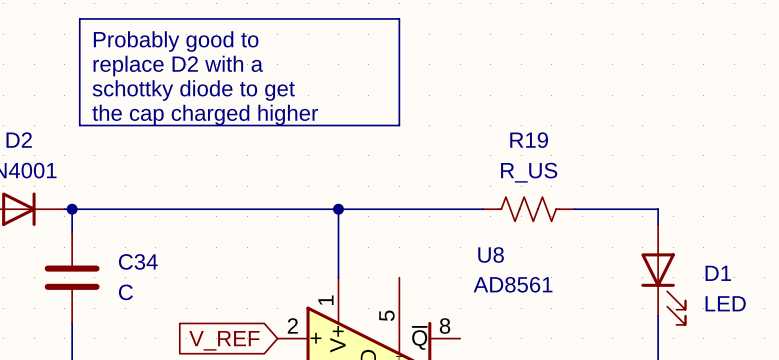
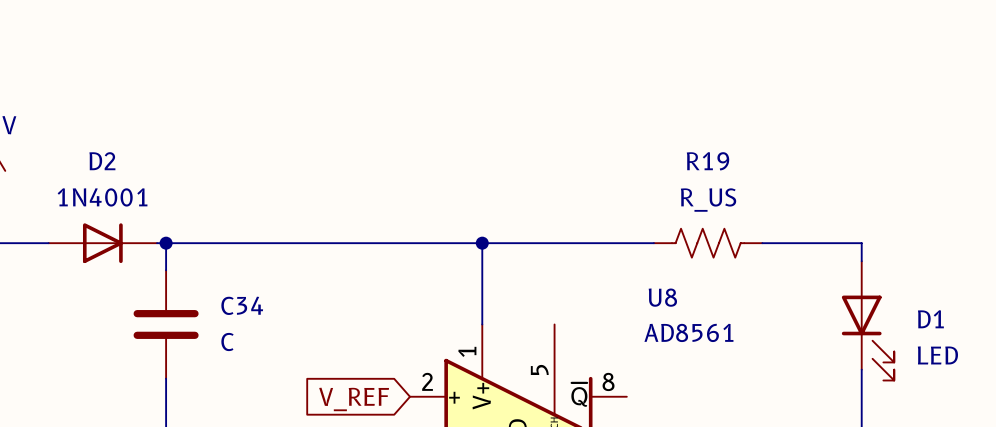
line: (79, 18) (399, 18) (399, 125) (79, 125) (79, 18) -> none
text: Probably good to (176, 41) -> none
text: replace D2 with a (178, 66) -> none
text: schottky diode to get (193, 90) -> none
text: the cap charged higher (205, 115) -> none

